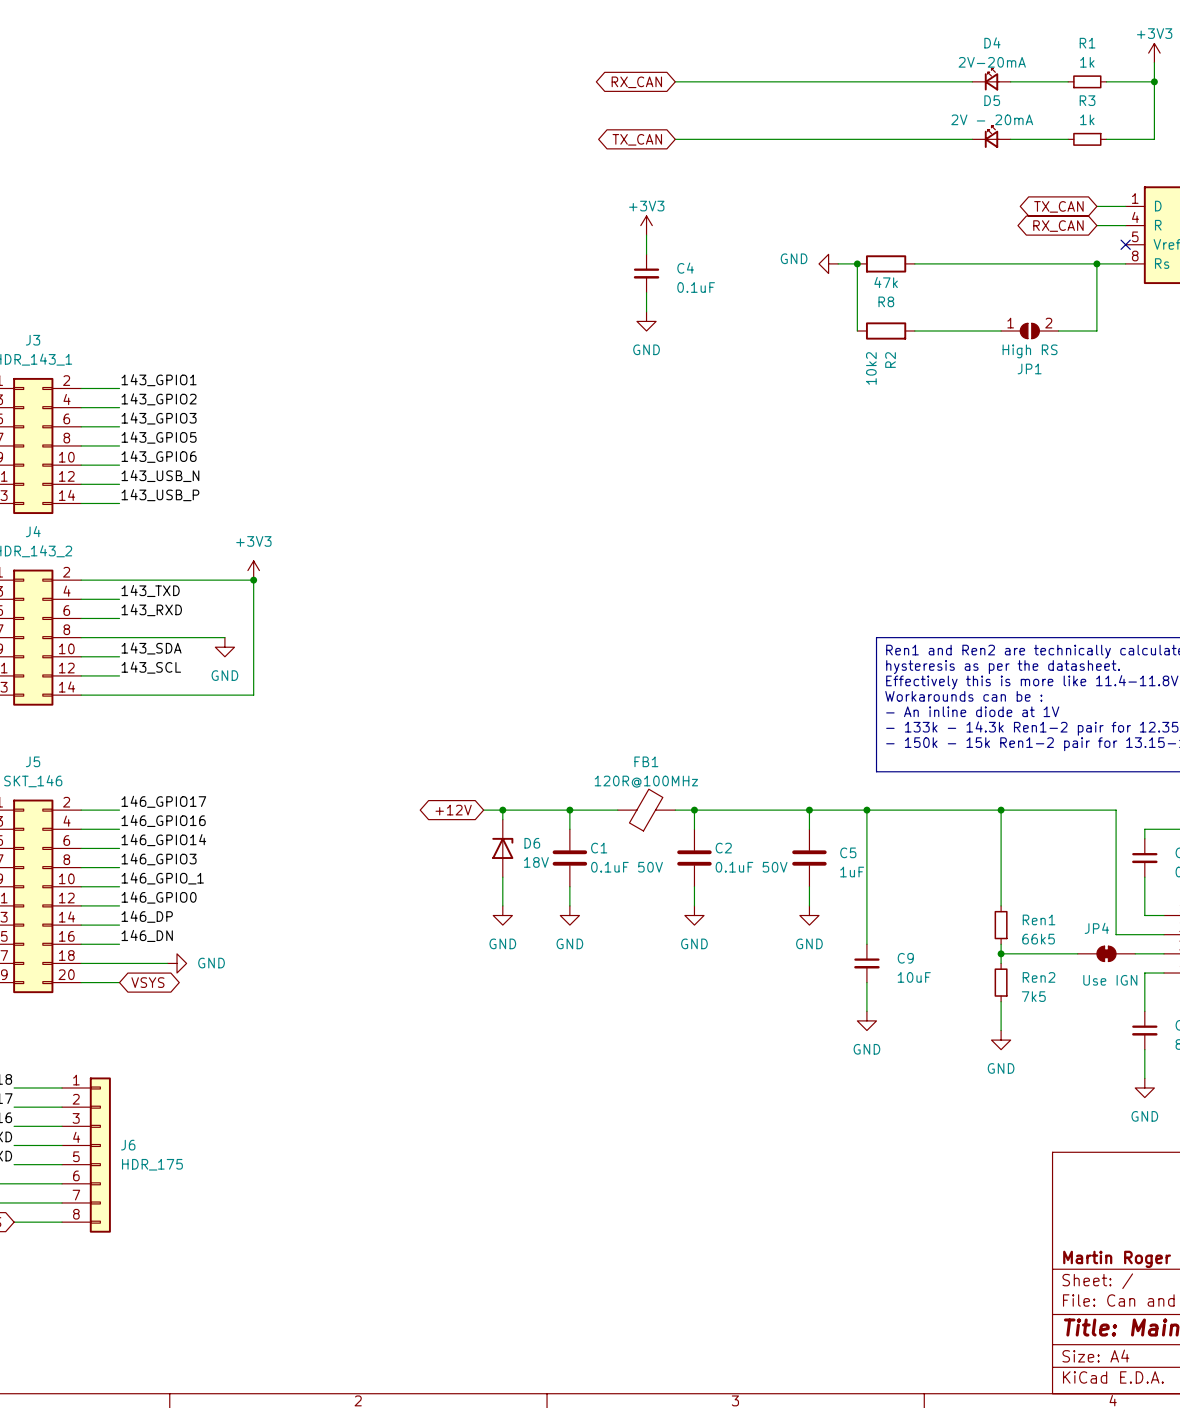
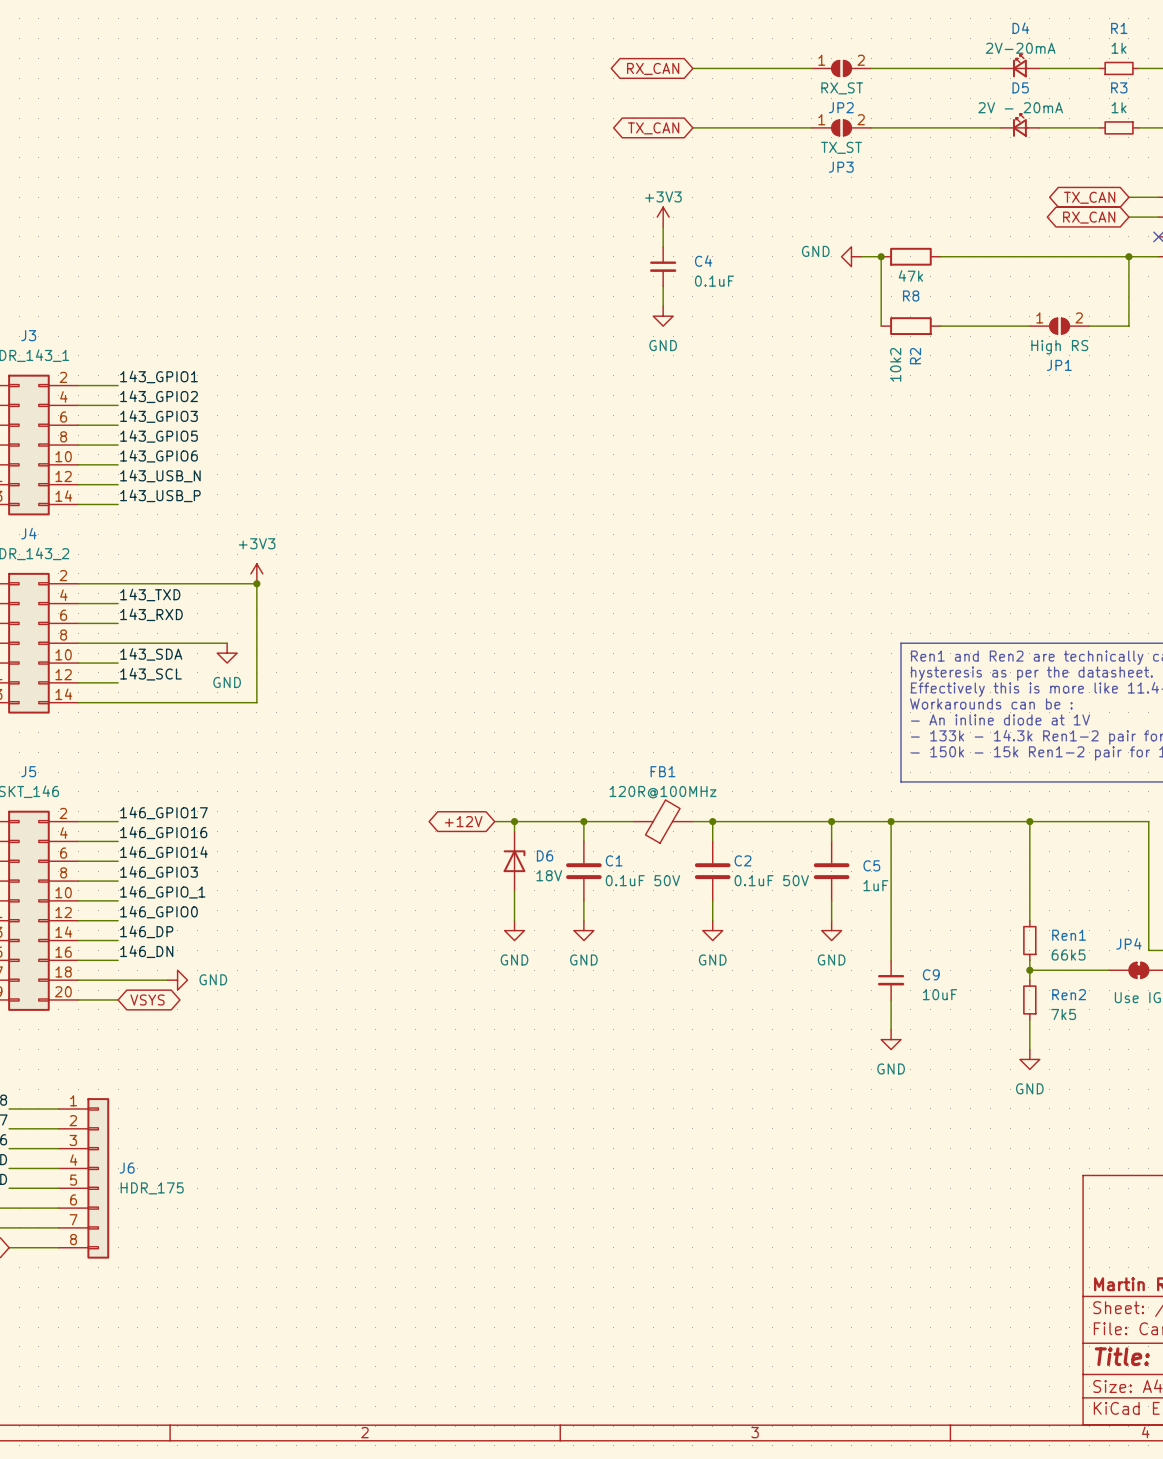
JP2: none -> RX_ST (841, 68)
JP3: none -> TX_ST (841, 127)

